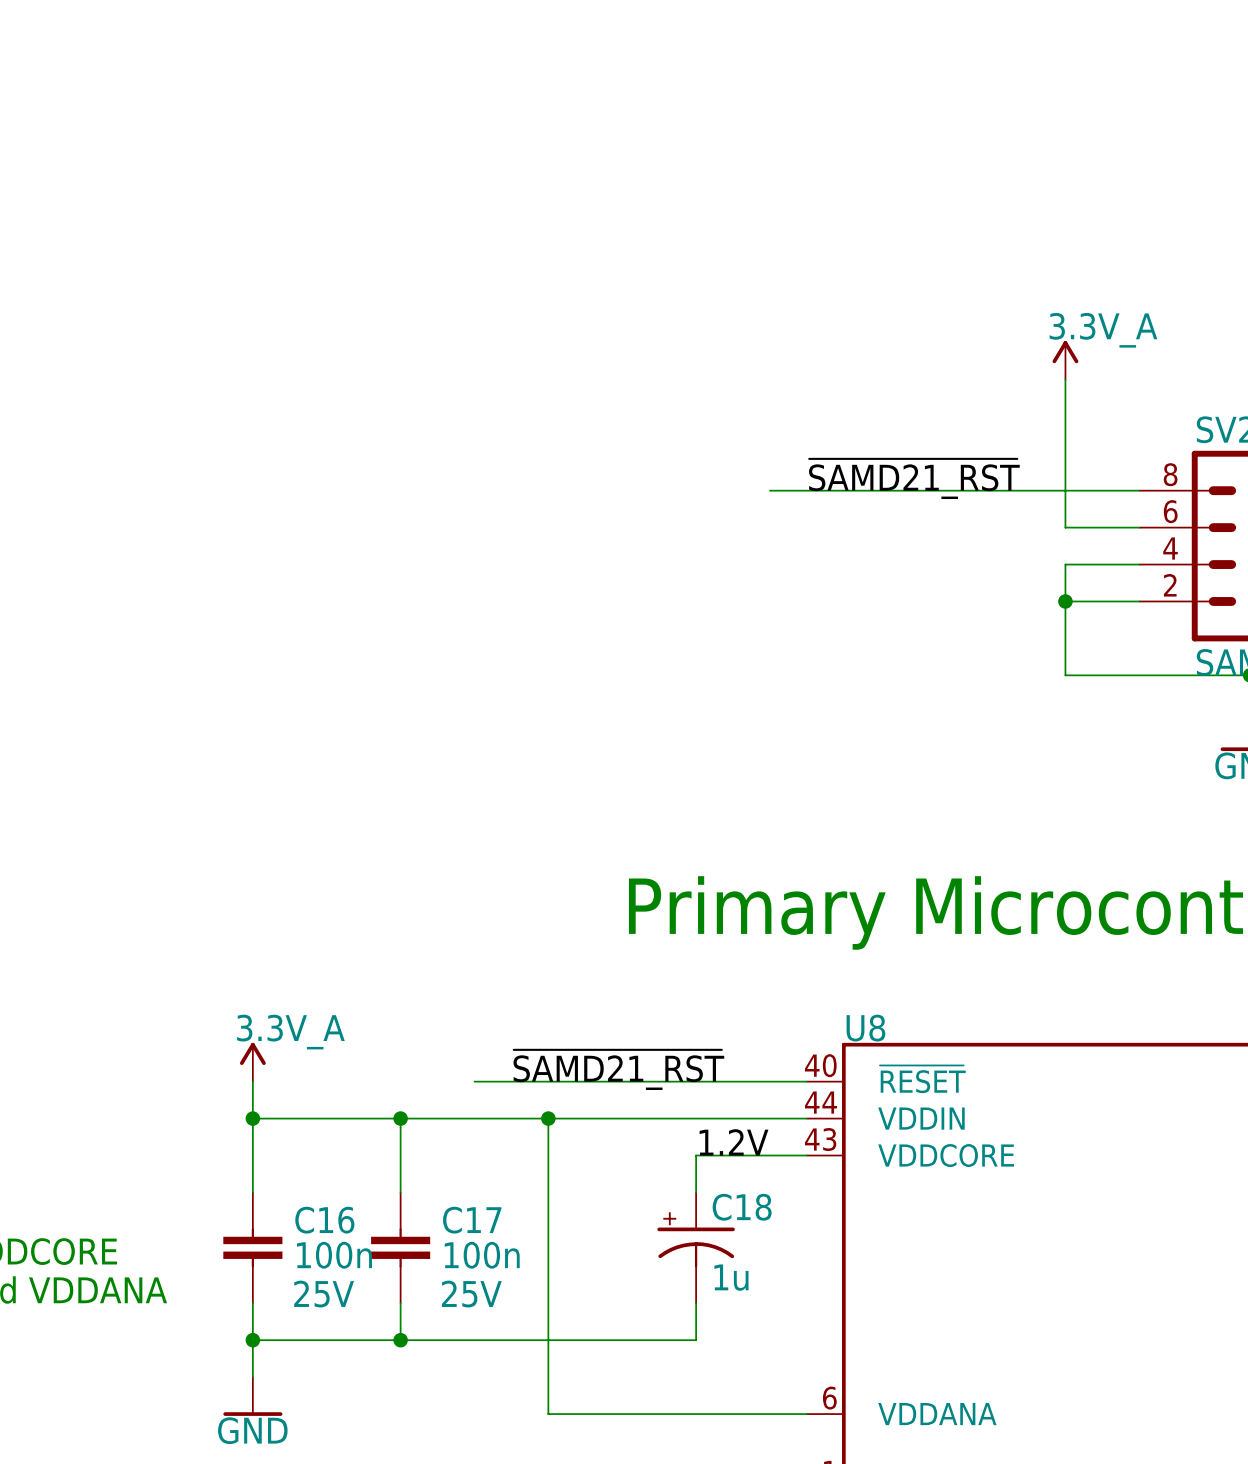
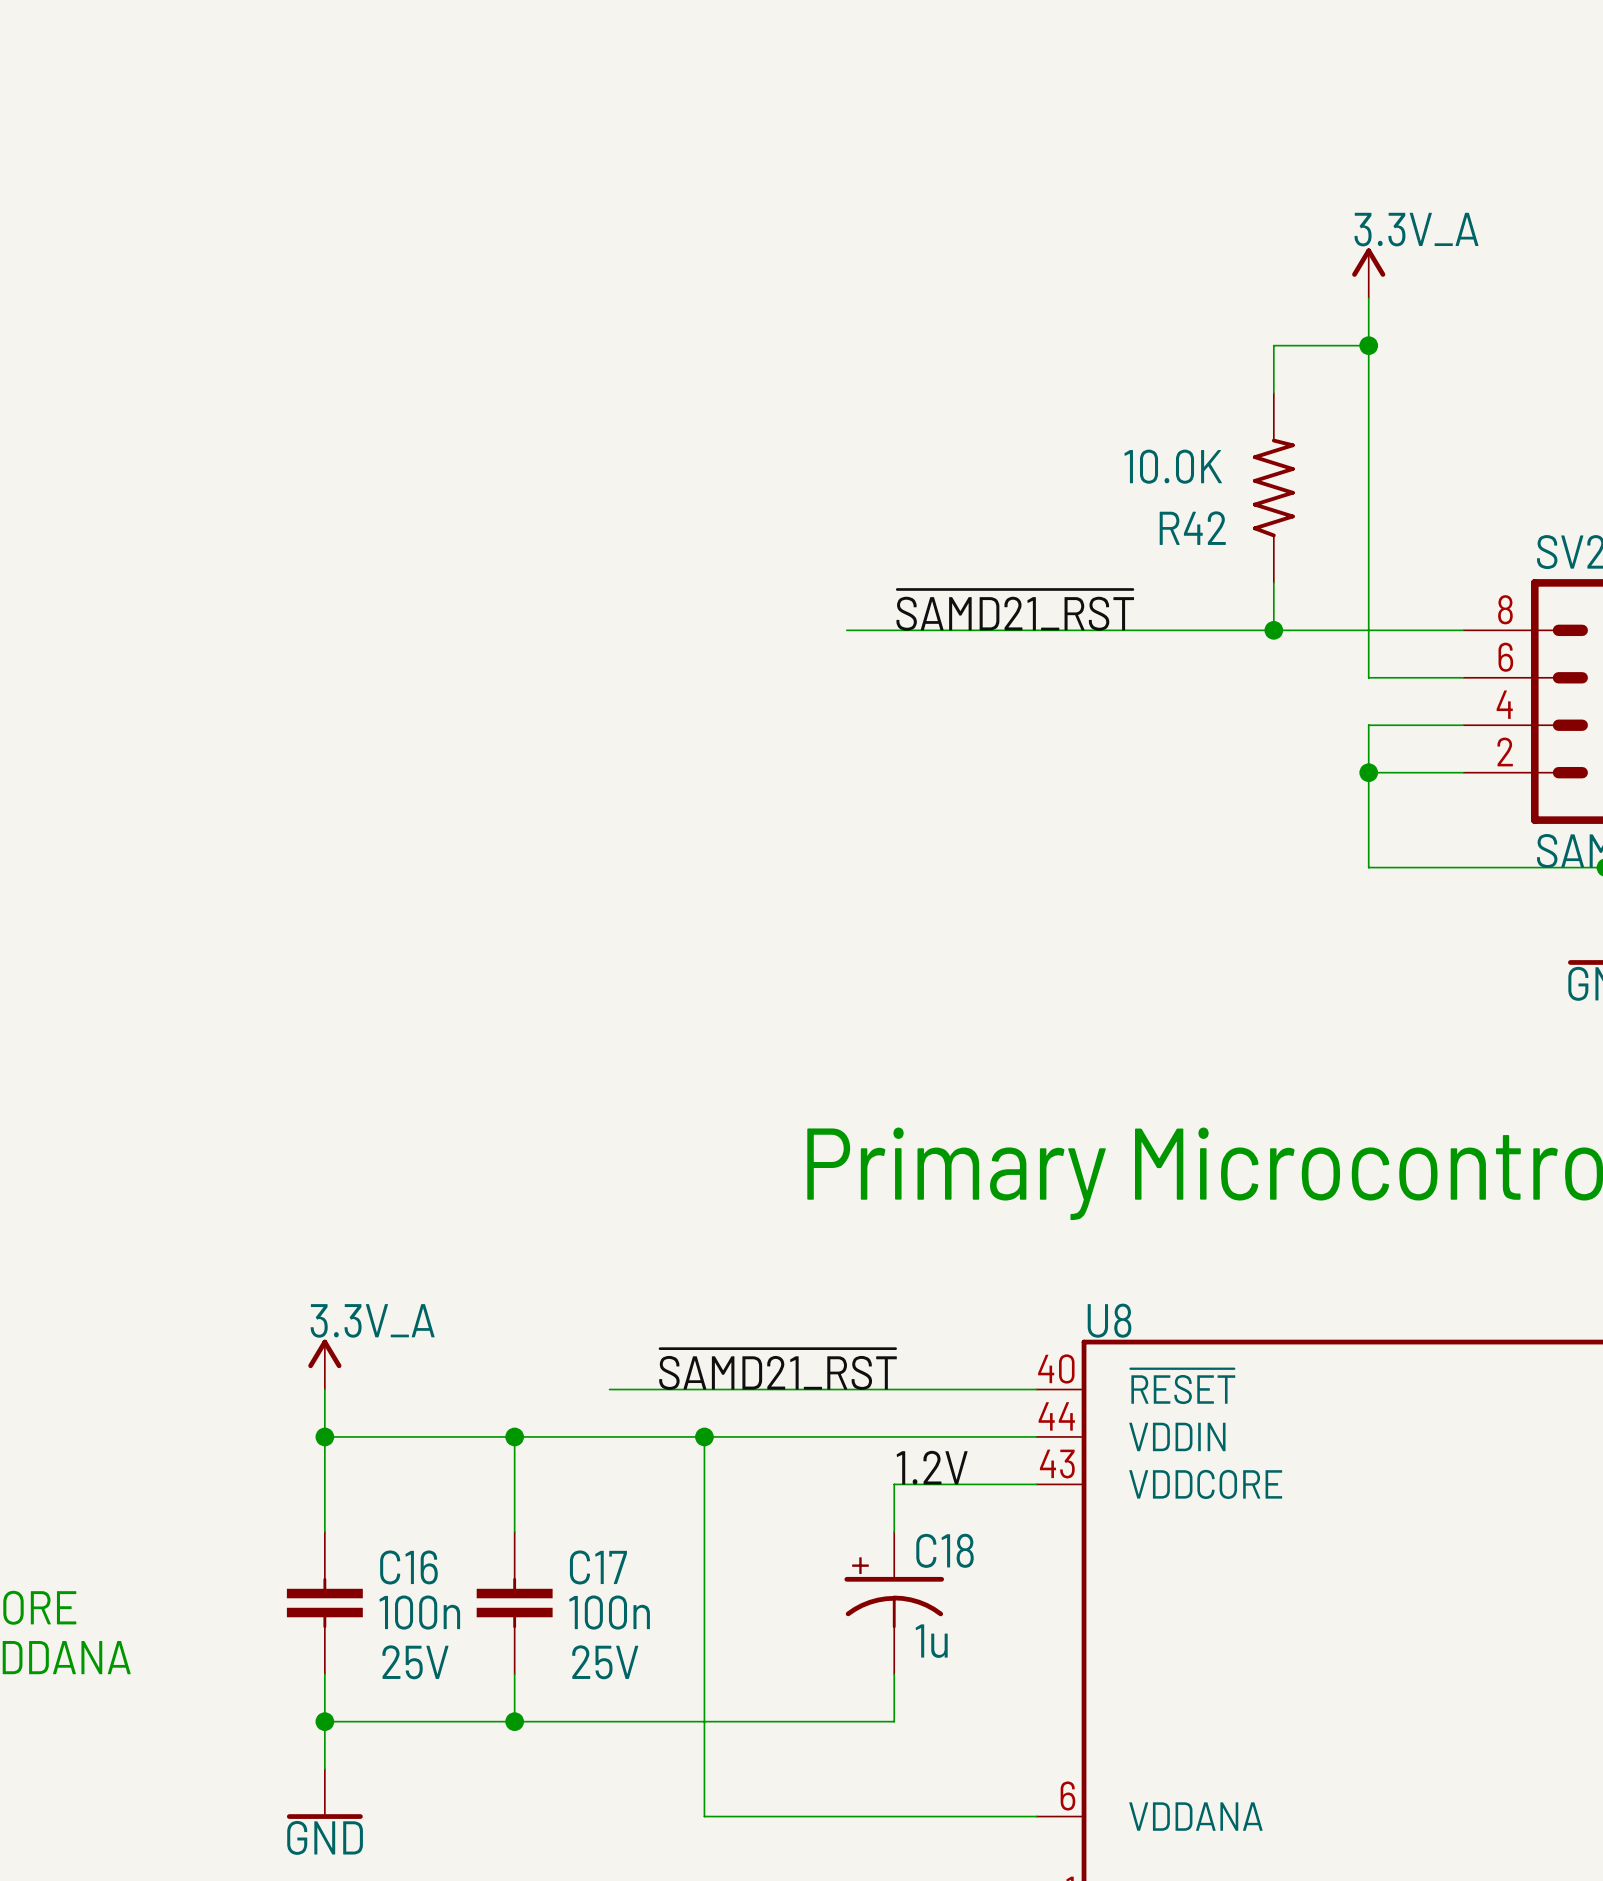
wire: none -> (1368, 298) (1368, 487)
wire: none -> (1368, 345) (1273, 345) (1273, 393)
junction: none -> (1368, 345)
power symbol position: 3.3V_A (1065, 360) -> 3.3V_A (1368, 273)
R42: none -> 10.0K (1273, 487)
wire: none -> (1273, 582) (1273, 630)
label position: ~{SAMD21_RST} (914, 478) -> ~{SAMD21_RST} (1015, 610)
wire: none -> (846, 630) (989, 630)
junction: none -> (1273, 630)

